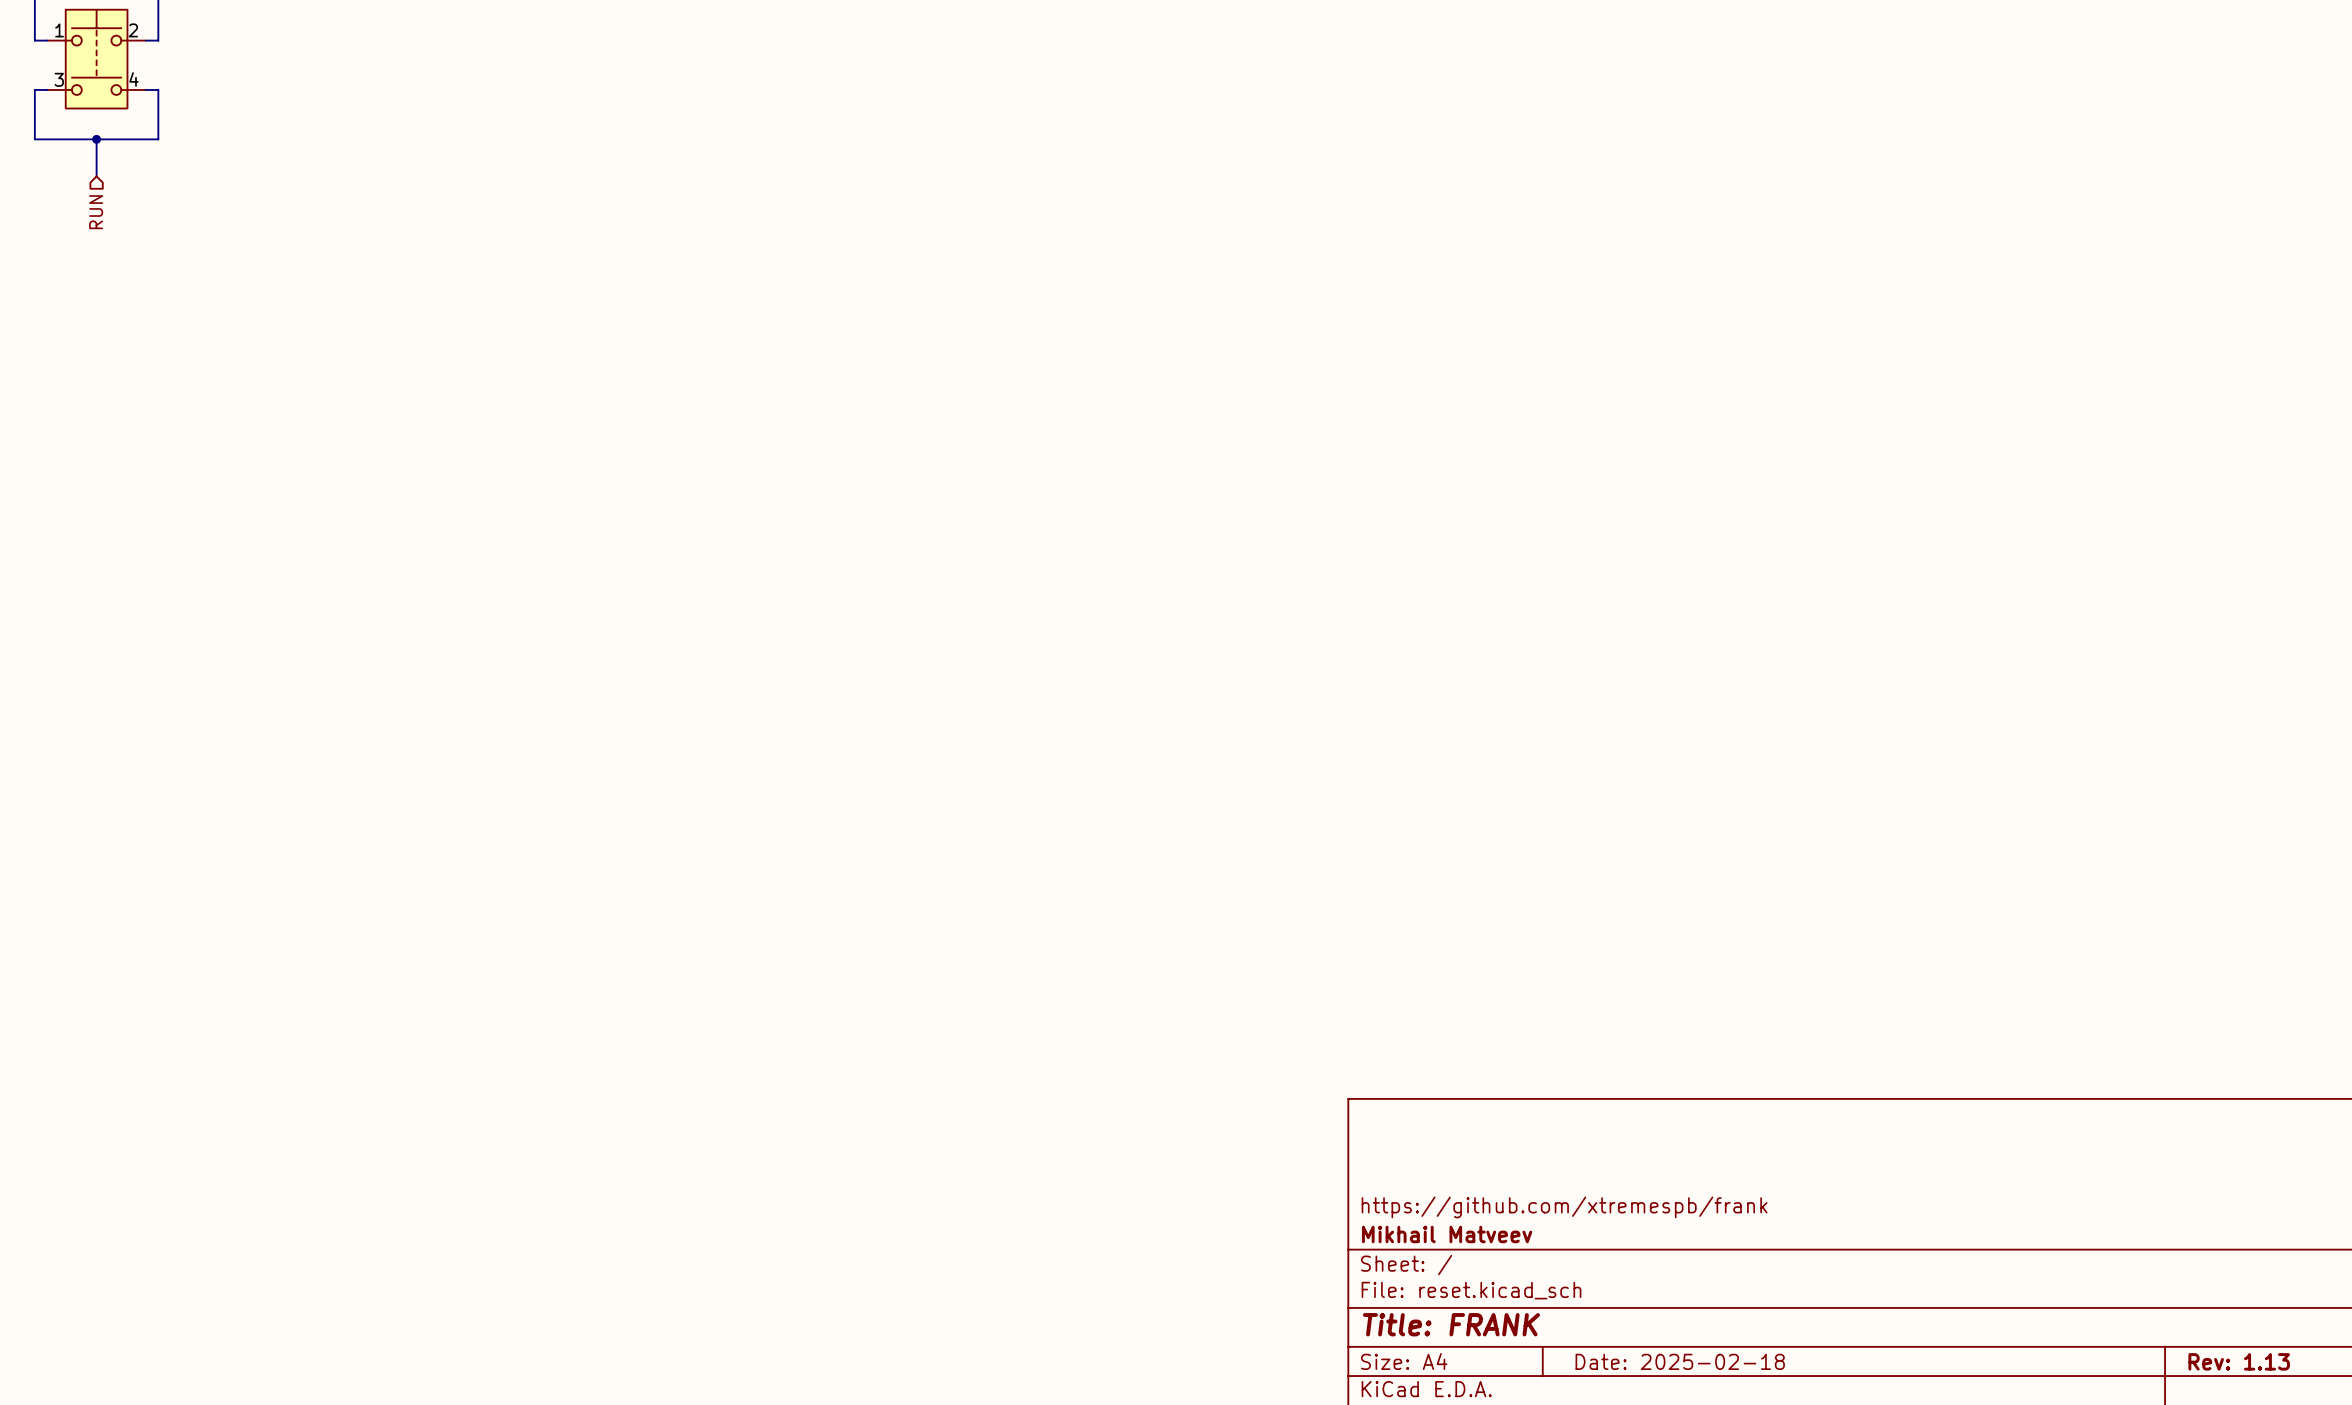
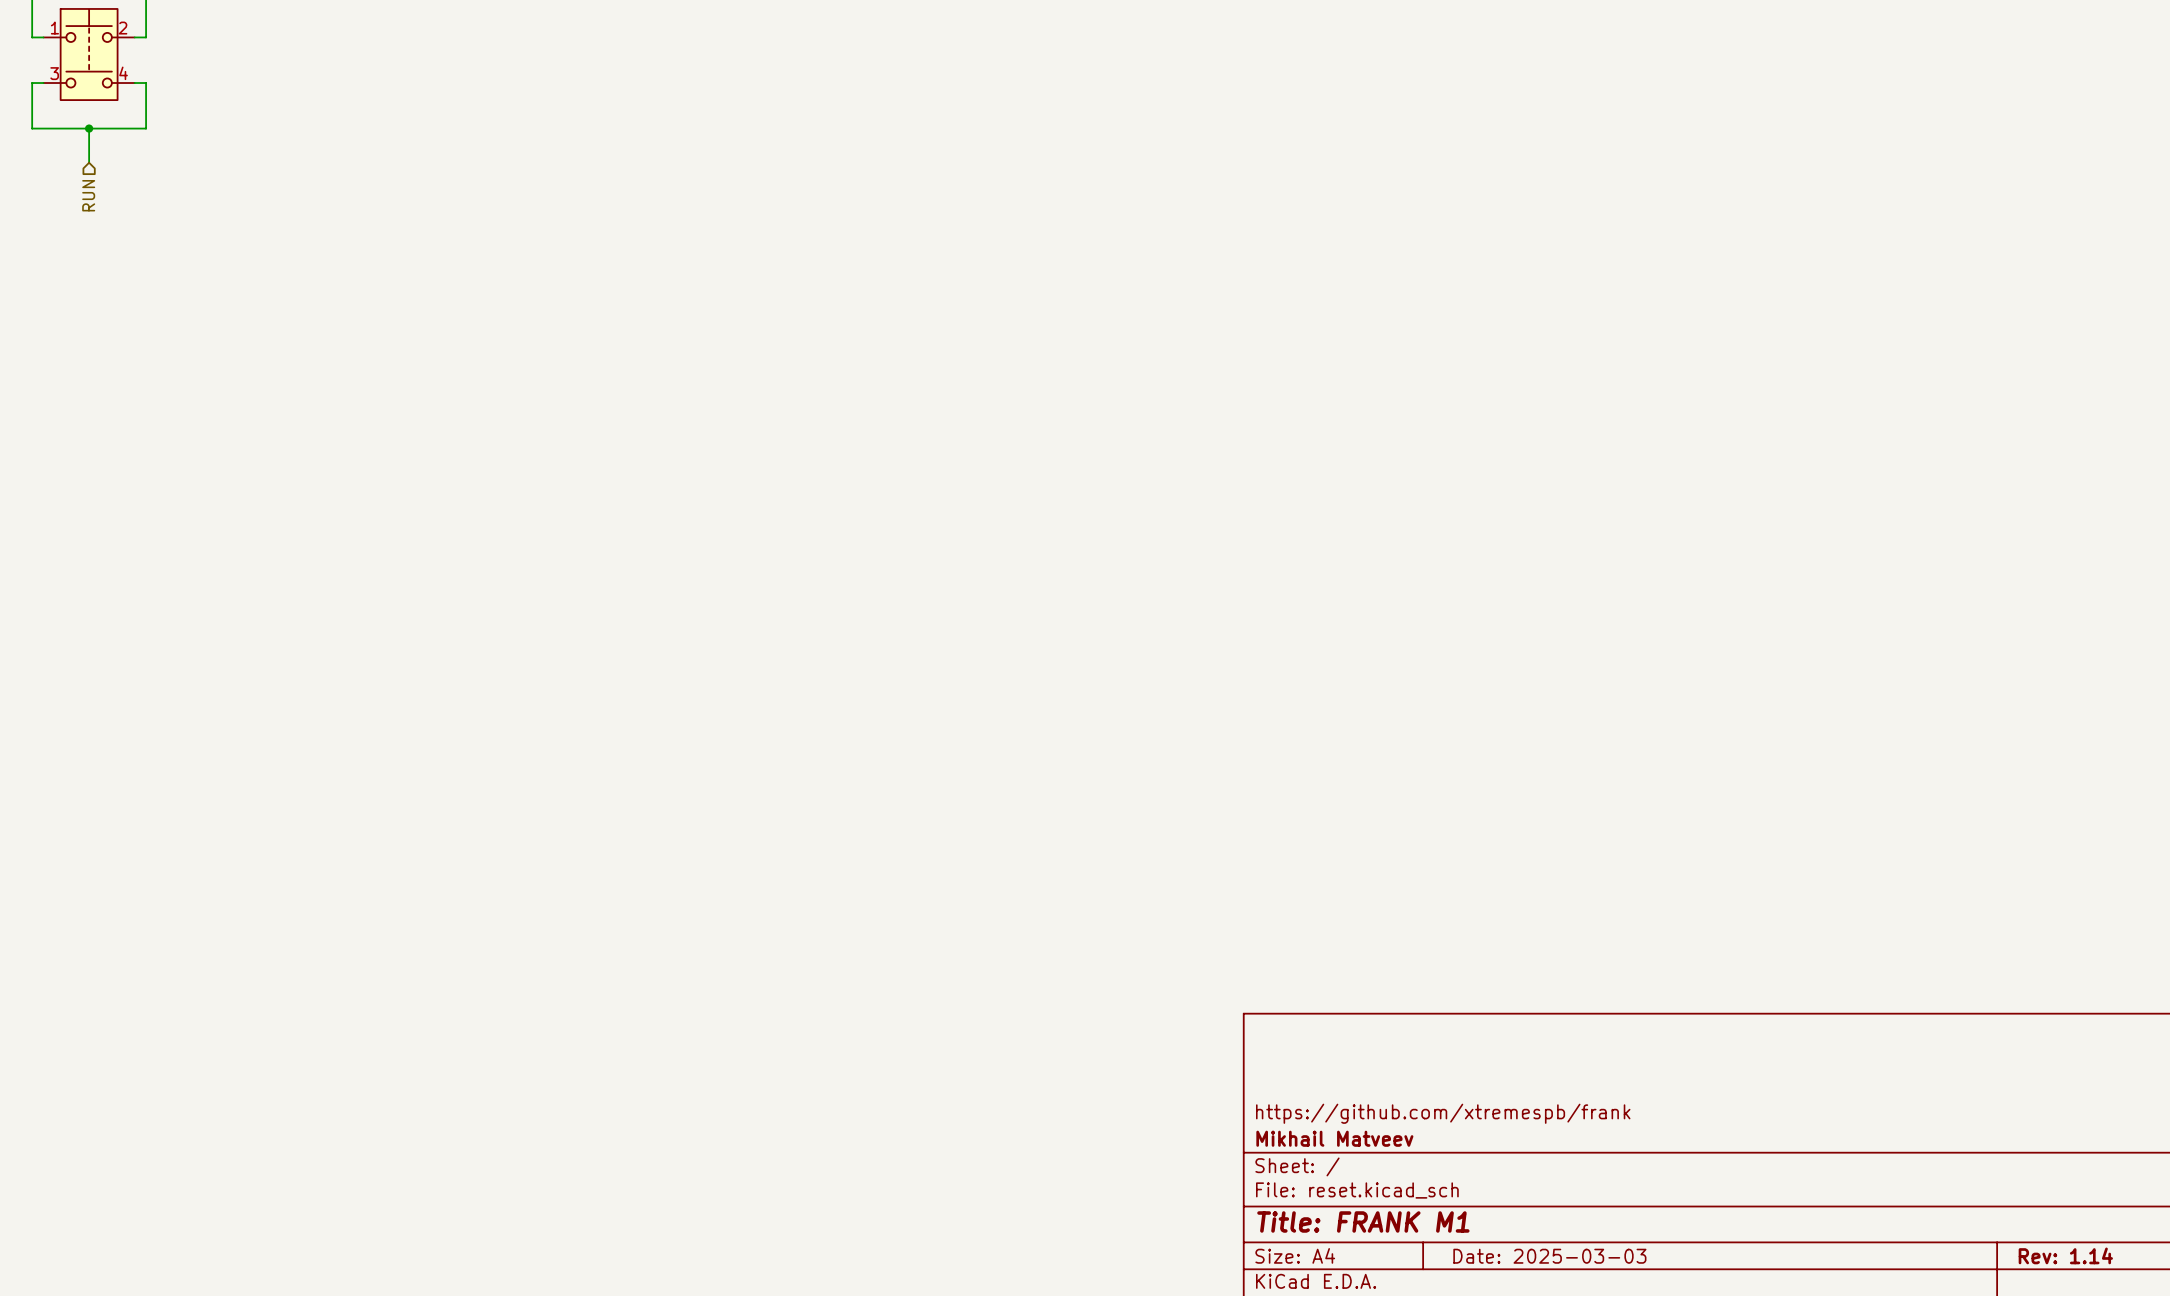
title block: Title: FRANK (1451, 1324) -> Title: FRANK M1 (1363, 1221)
title block: Date: 2025-02-18 (1680, 1361) -> Date: 2025-03-03 (1549, 1256)
title block: Rev: 1.13 (2239, 1361) -> Rev: 1.14 (2065, 1255)

